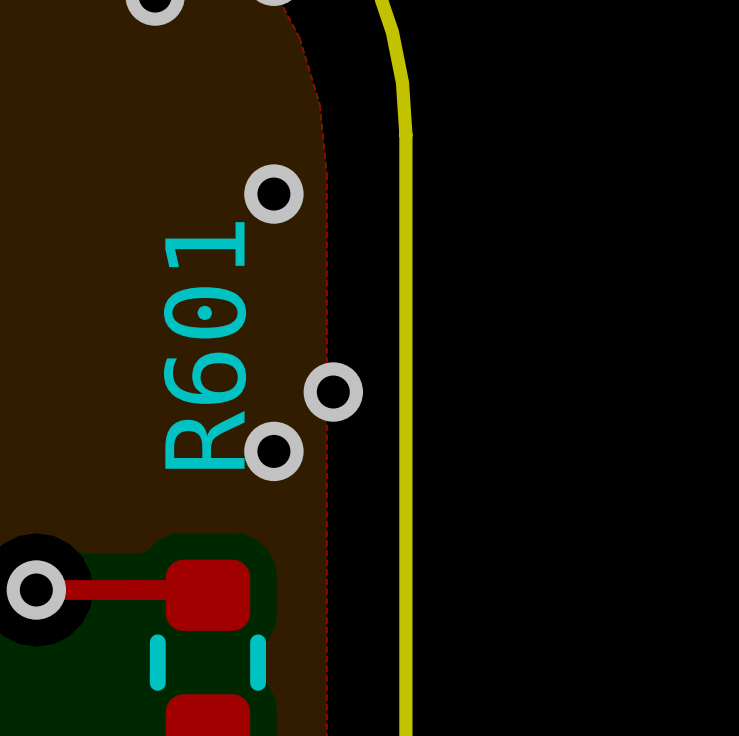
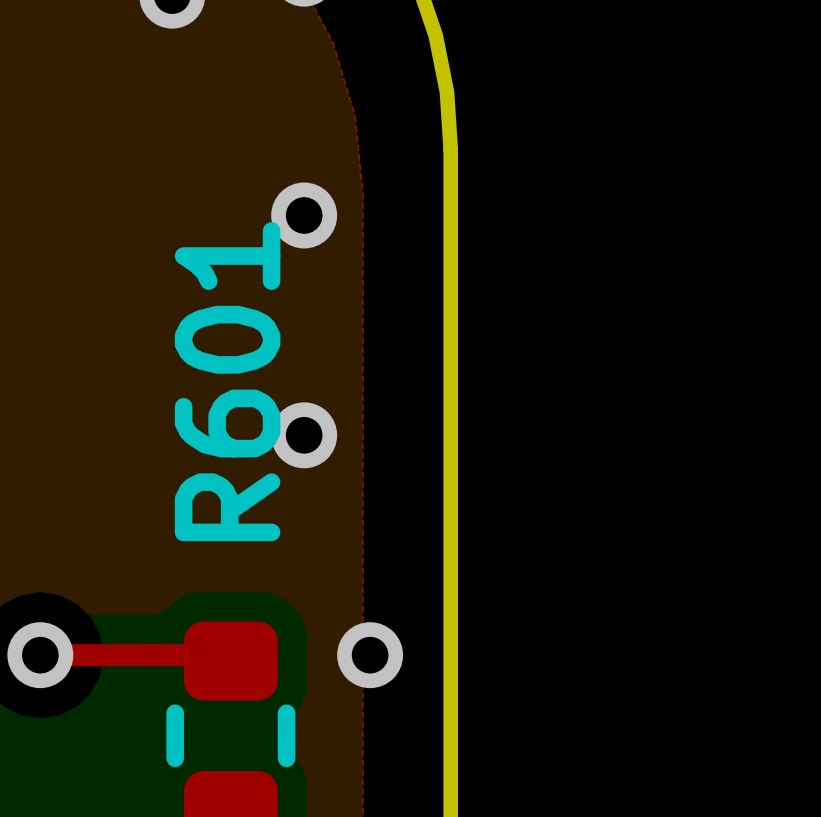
via: none -> (304, 435)
via: (333, 392) -> none
via: (273, 451) -> none
via: none -> (370, 655)

